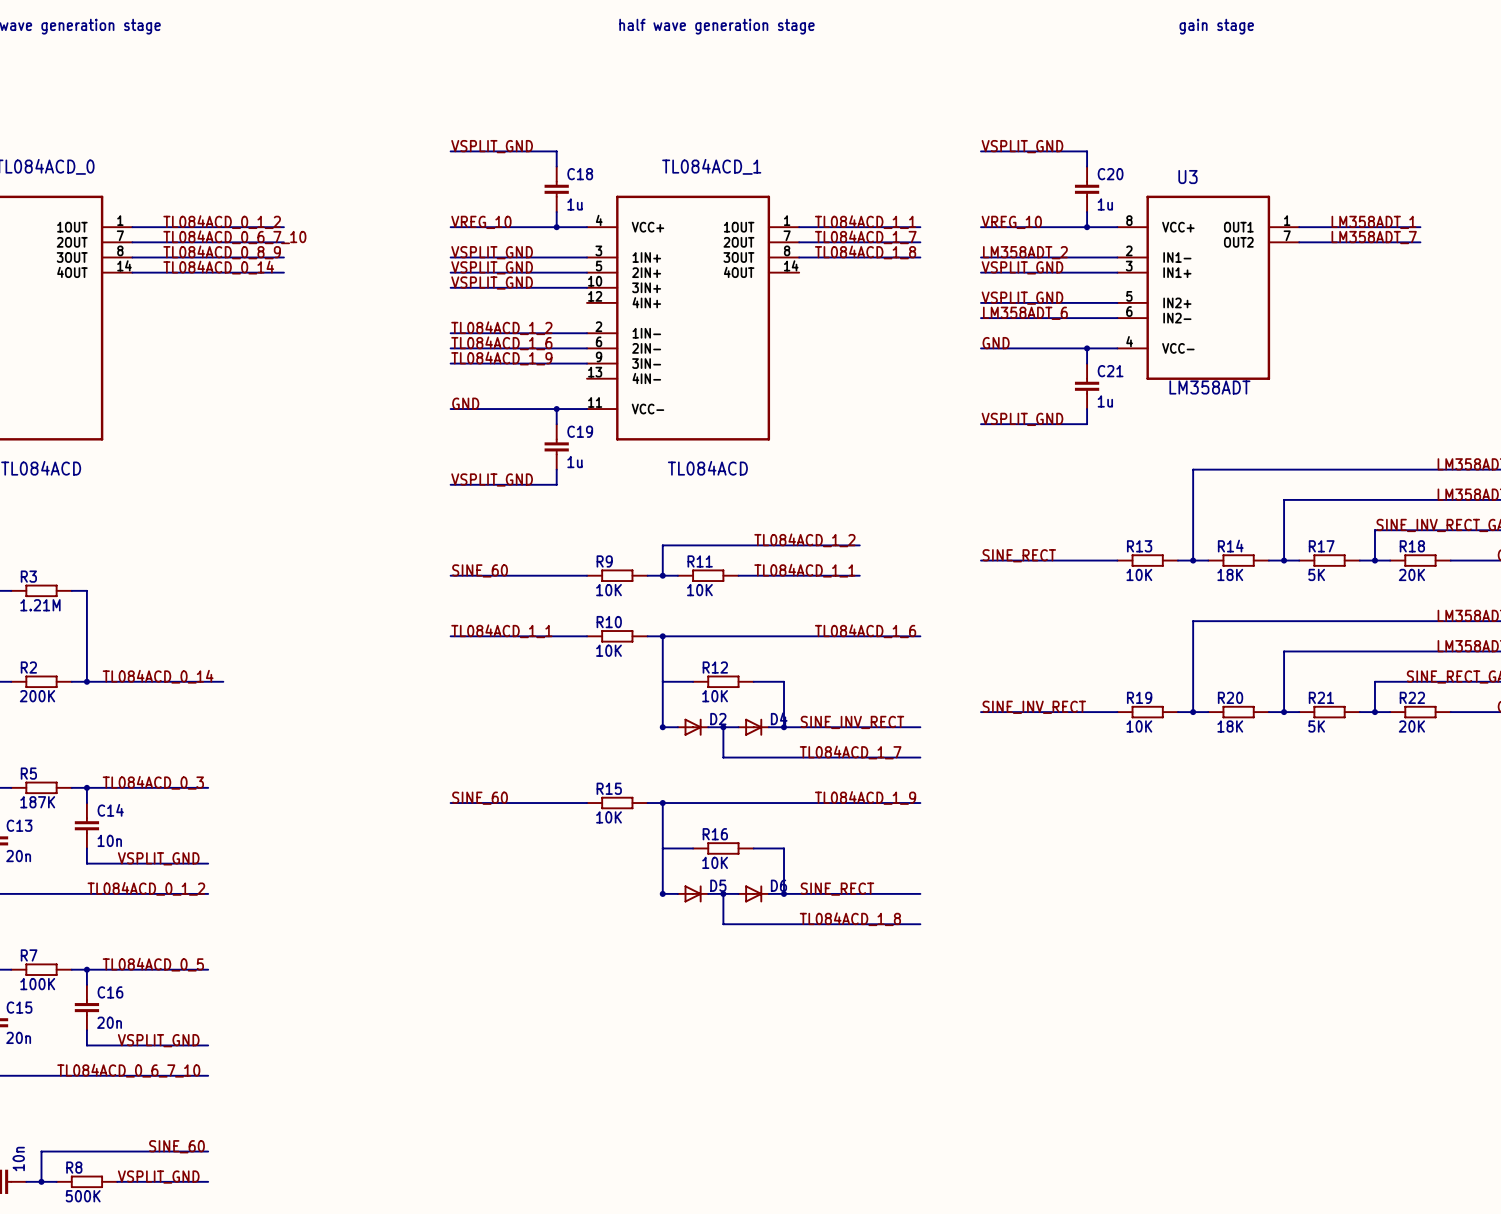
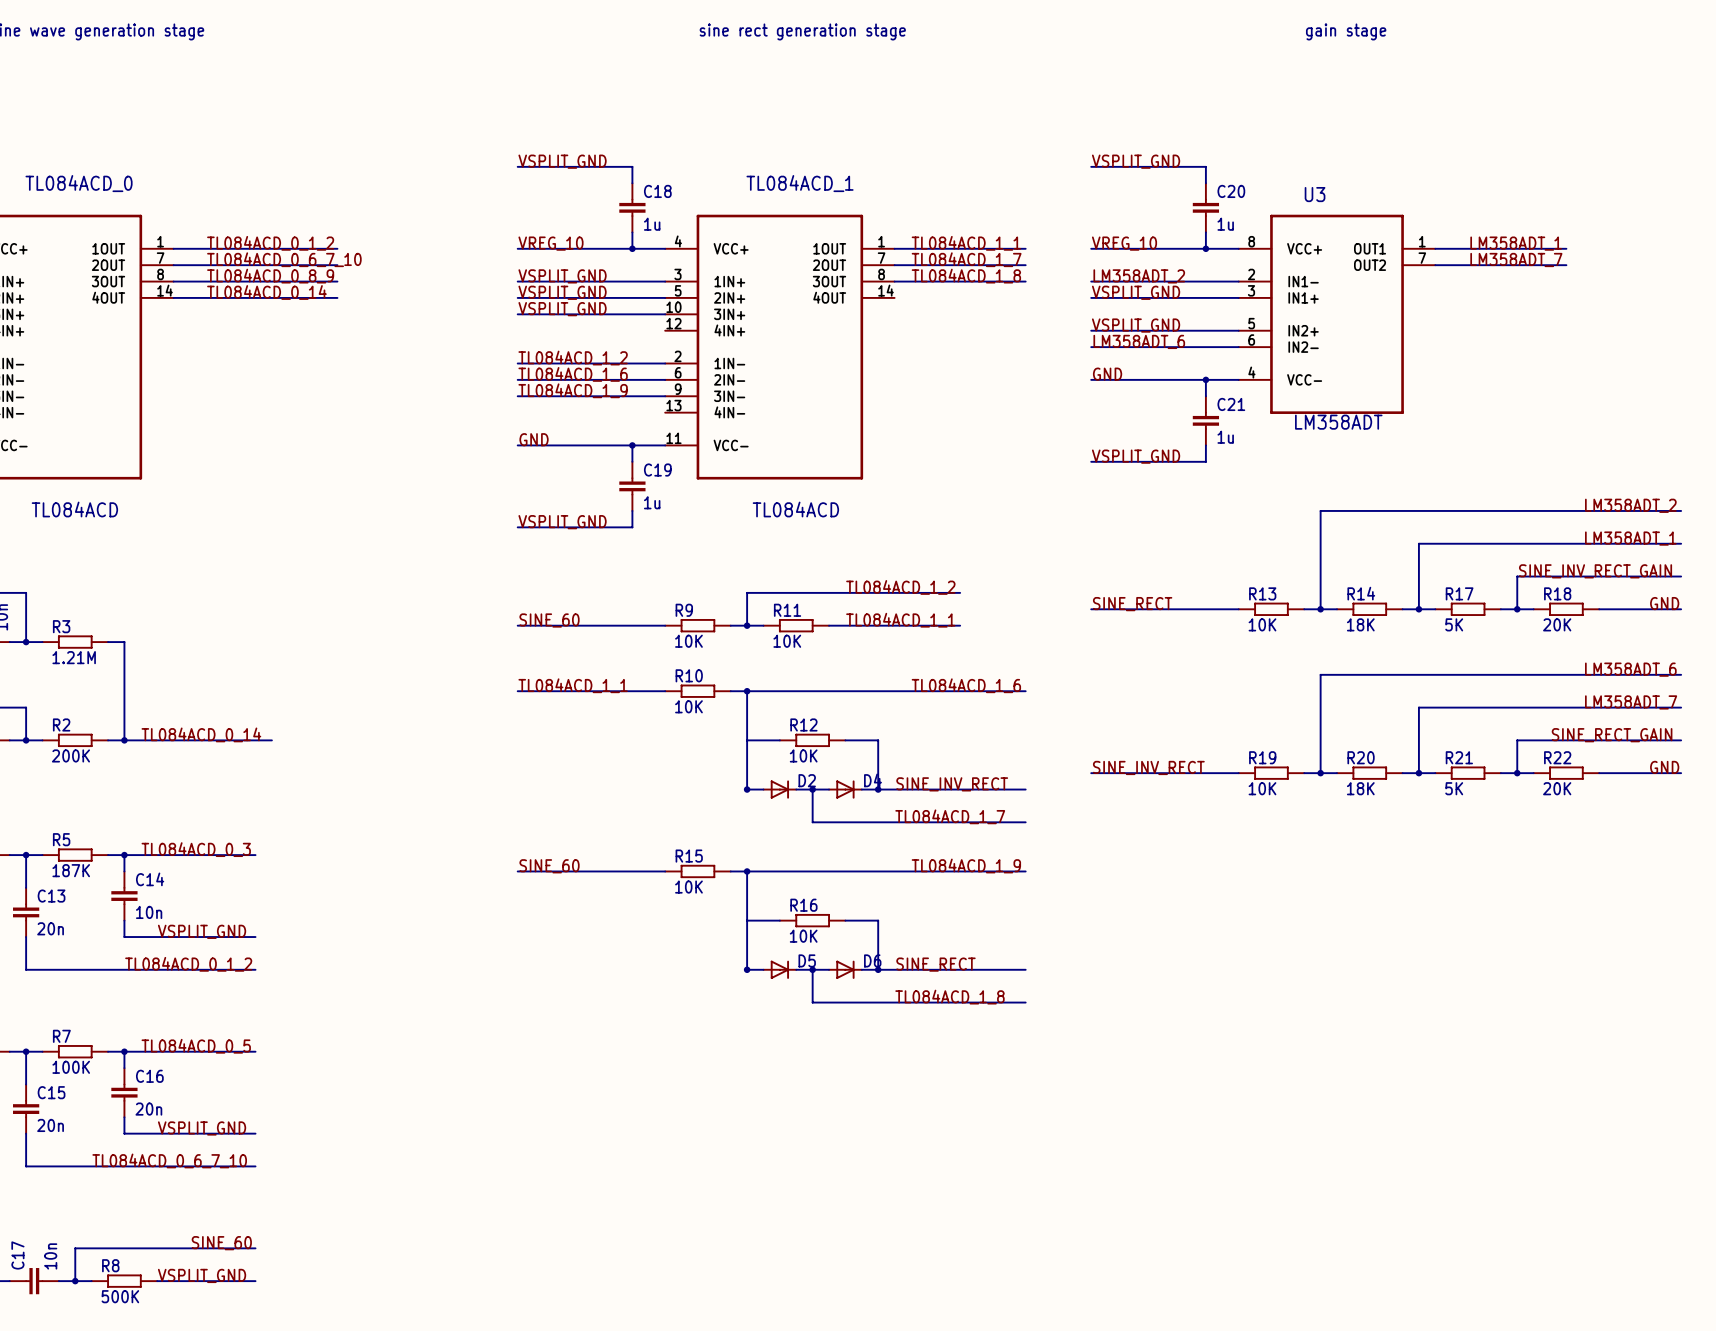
text: half wave generation stage (716, 26) -> sine rect generation stage (802, 31)

